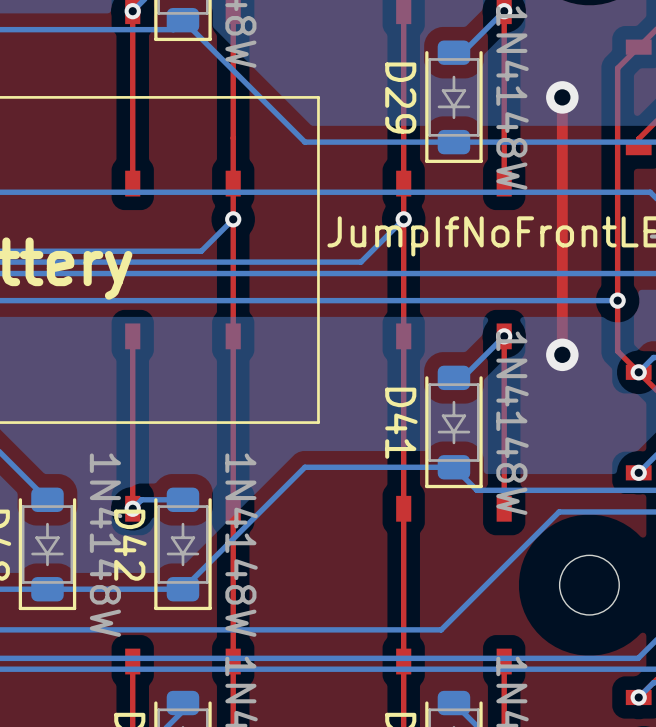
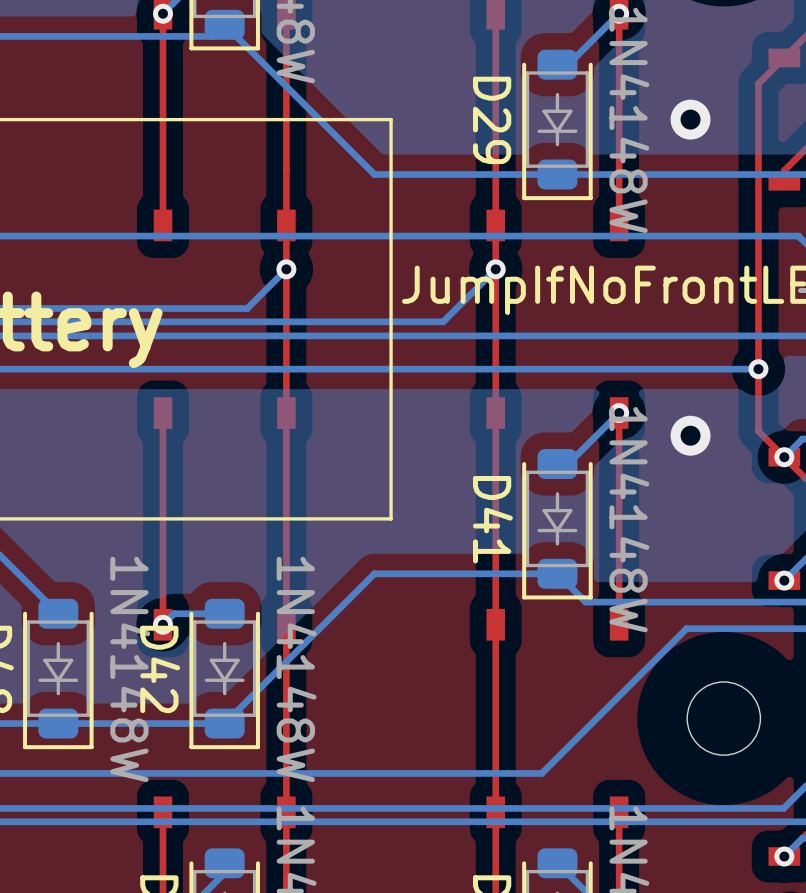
top track: (562, 97) (562, 354) -> none

